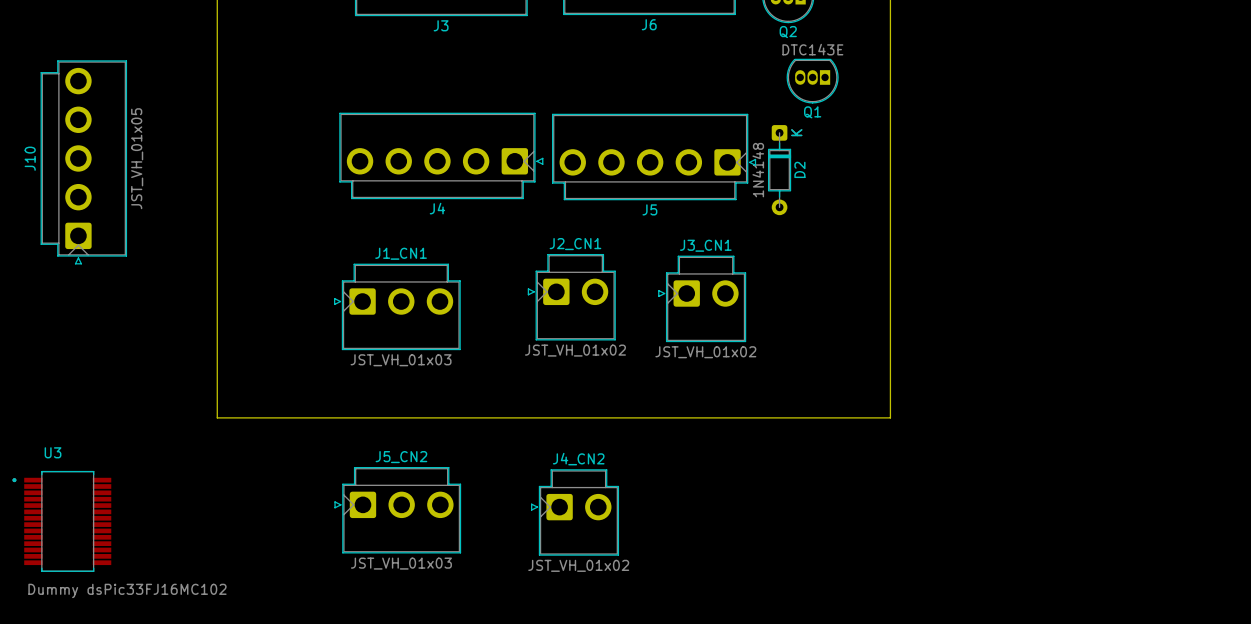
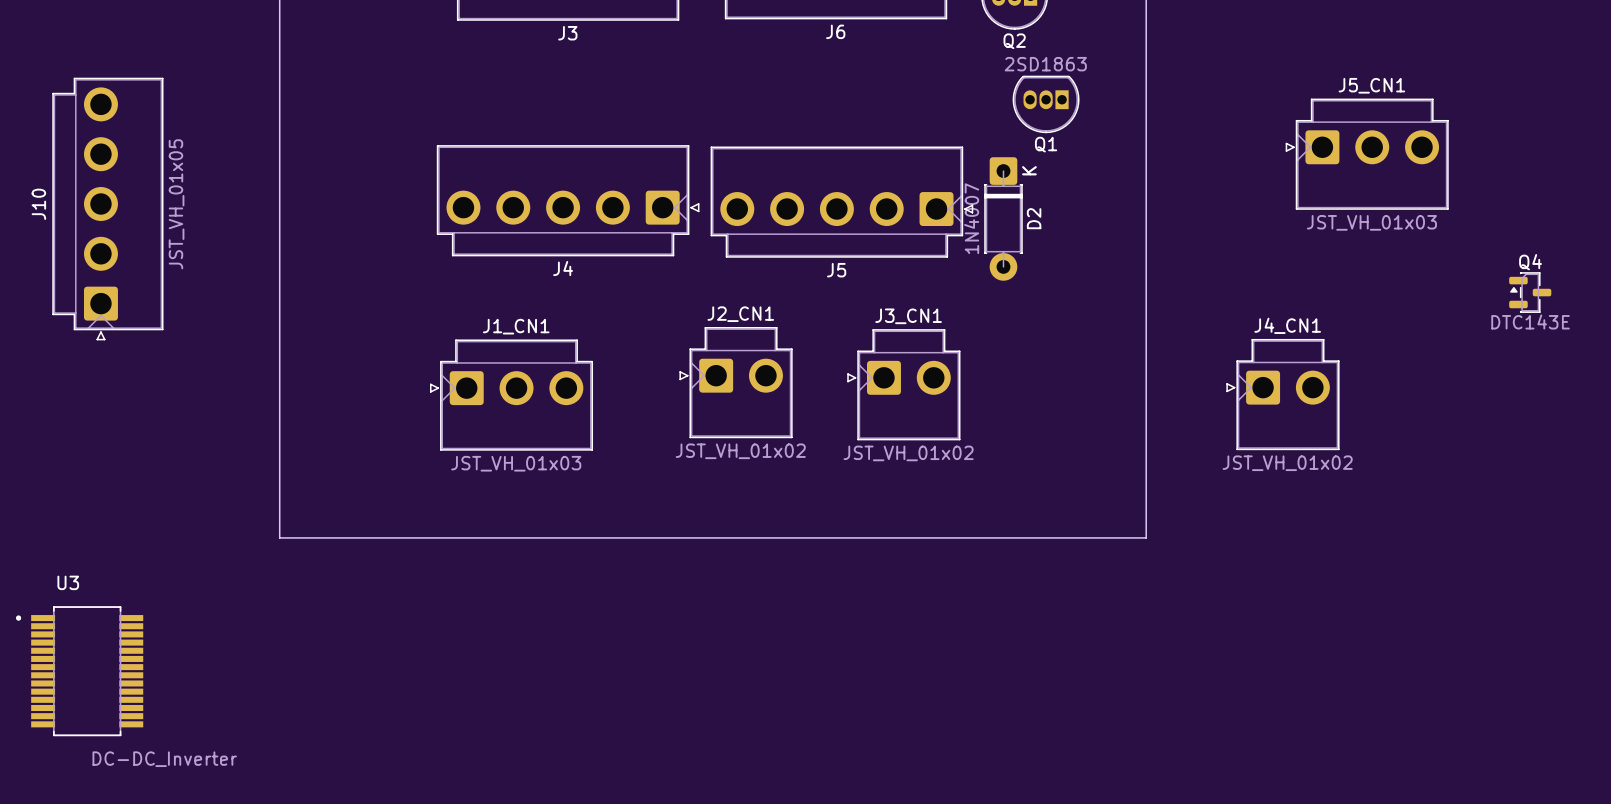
Q1 value: DTC143E (812, 49) -> 2SD1863 (1045, 64)
J5_CN1: none -> JST_VH_01x03 (1367, 154)
D2 footprint: [768, 125, 792, 216] -> [984, 157, 1023, 281]
D2 value: 1N4148 (758, 170) -> 1N4007 (971, 218)
Q4: none -> DTC143E (1530, 292)
J4_CN1: none -> JST_VH_01x02 (1282, 394)
J5_CN2: JST_VH_01x03 (397, 510) -> none
J4_CN2: JST_VH_01x02 (575, 512) -> none
U3 value: Dummy dsPic33FJ16MC102 (127, 590) -> DC-DC_Inverter (164, 759)

